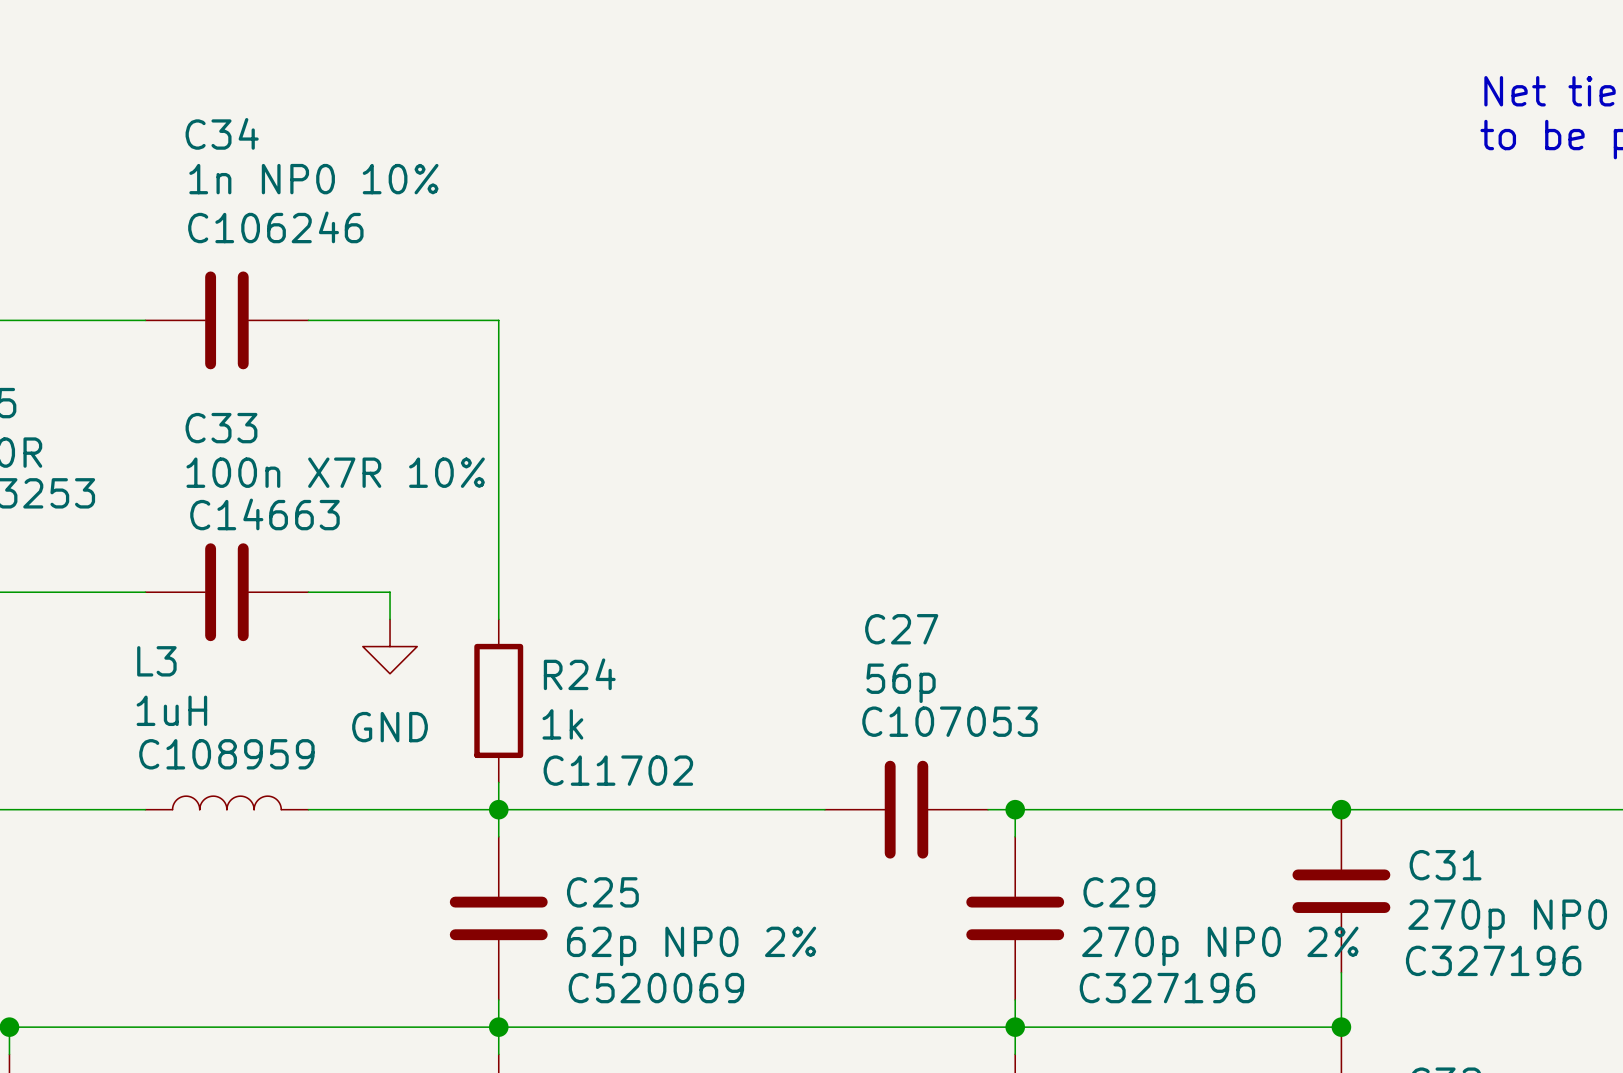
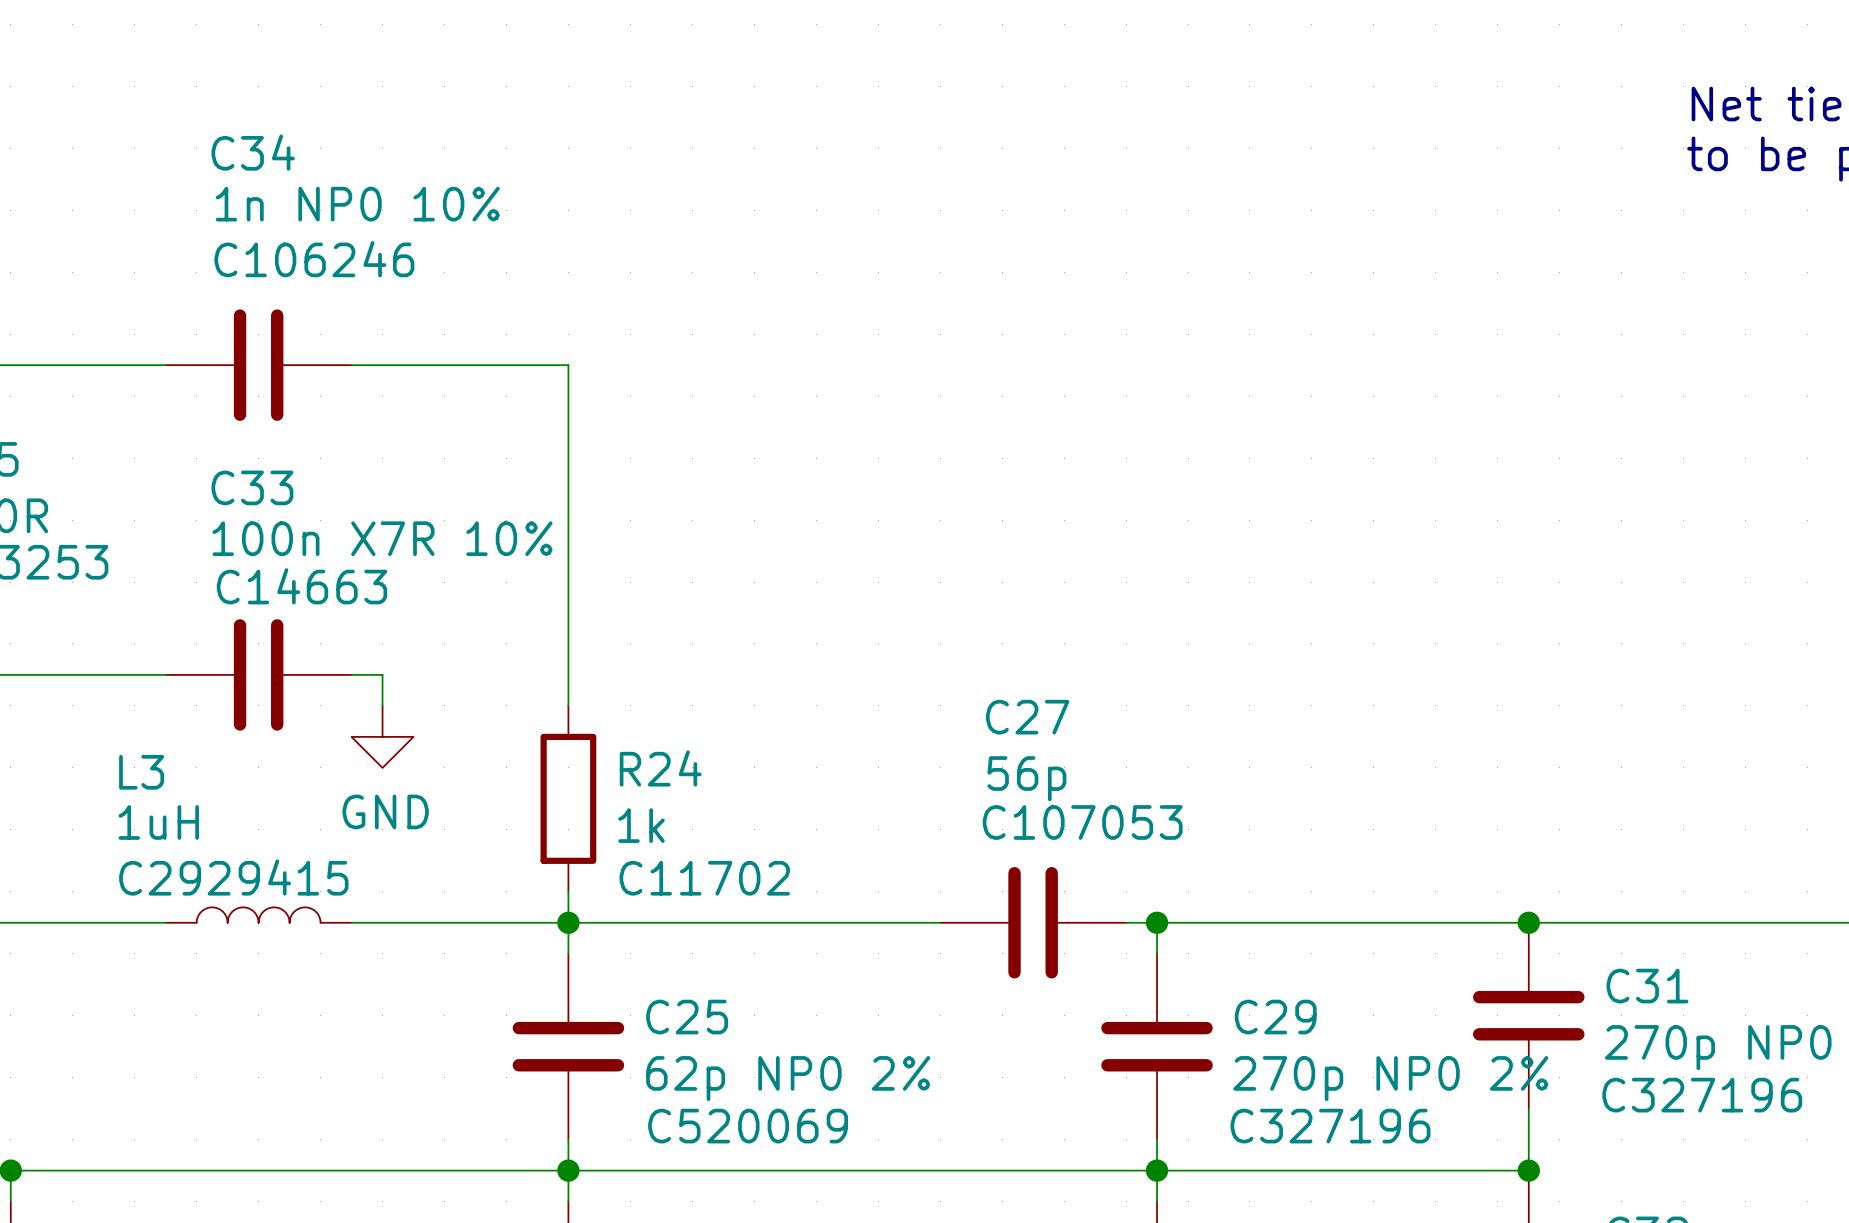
wire: (335, 592) (390, 592) (390, 619) -> (382, 674) (382, 705)
power symbol position: GND (390, 646) -> GND (382, 736)
L3 name position: L3 (156, 661) -> L3 (141, 772)
L3 value position: 1uH (171, 710) -> 1uH (158, 822)
power symbol text position: GND (390, 727) -> GND (385, 811)
L3 text: C108959 (226, 754) -> C2929415 (233, 877)

